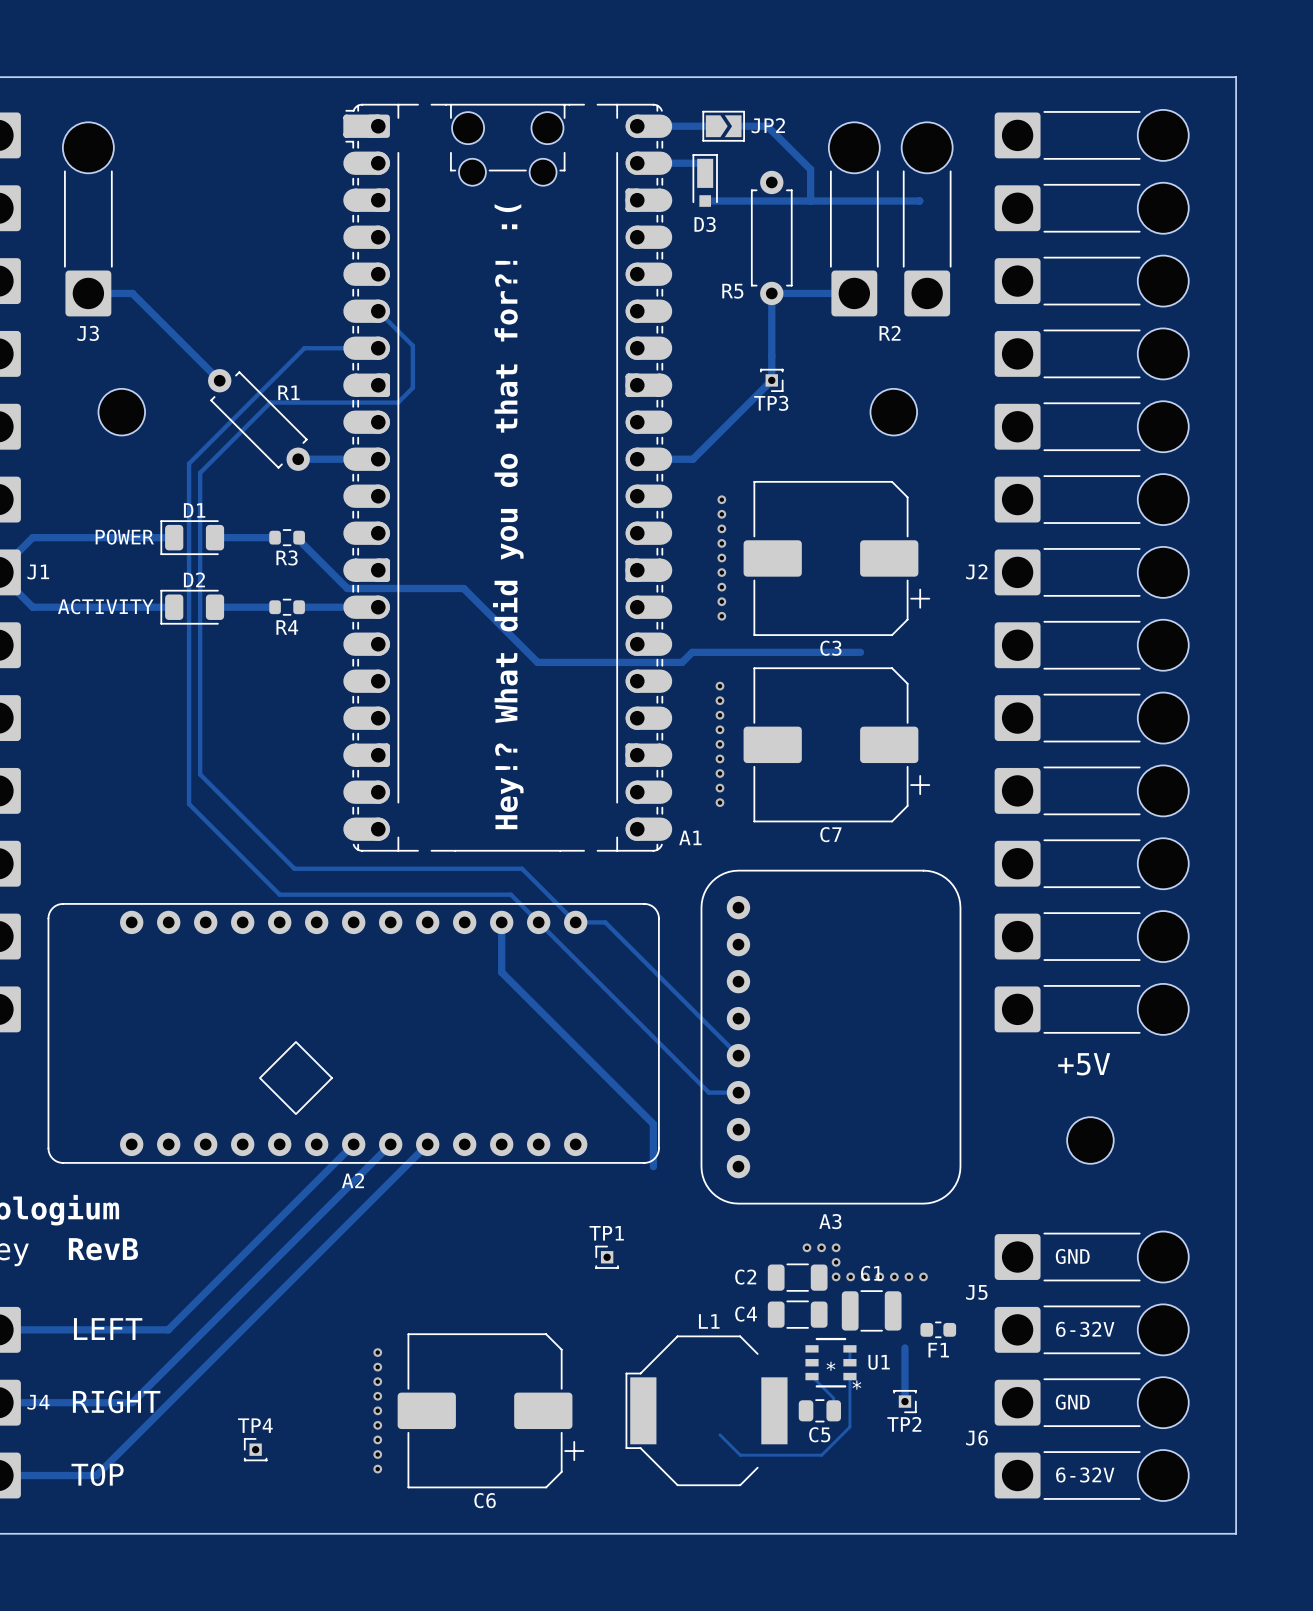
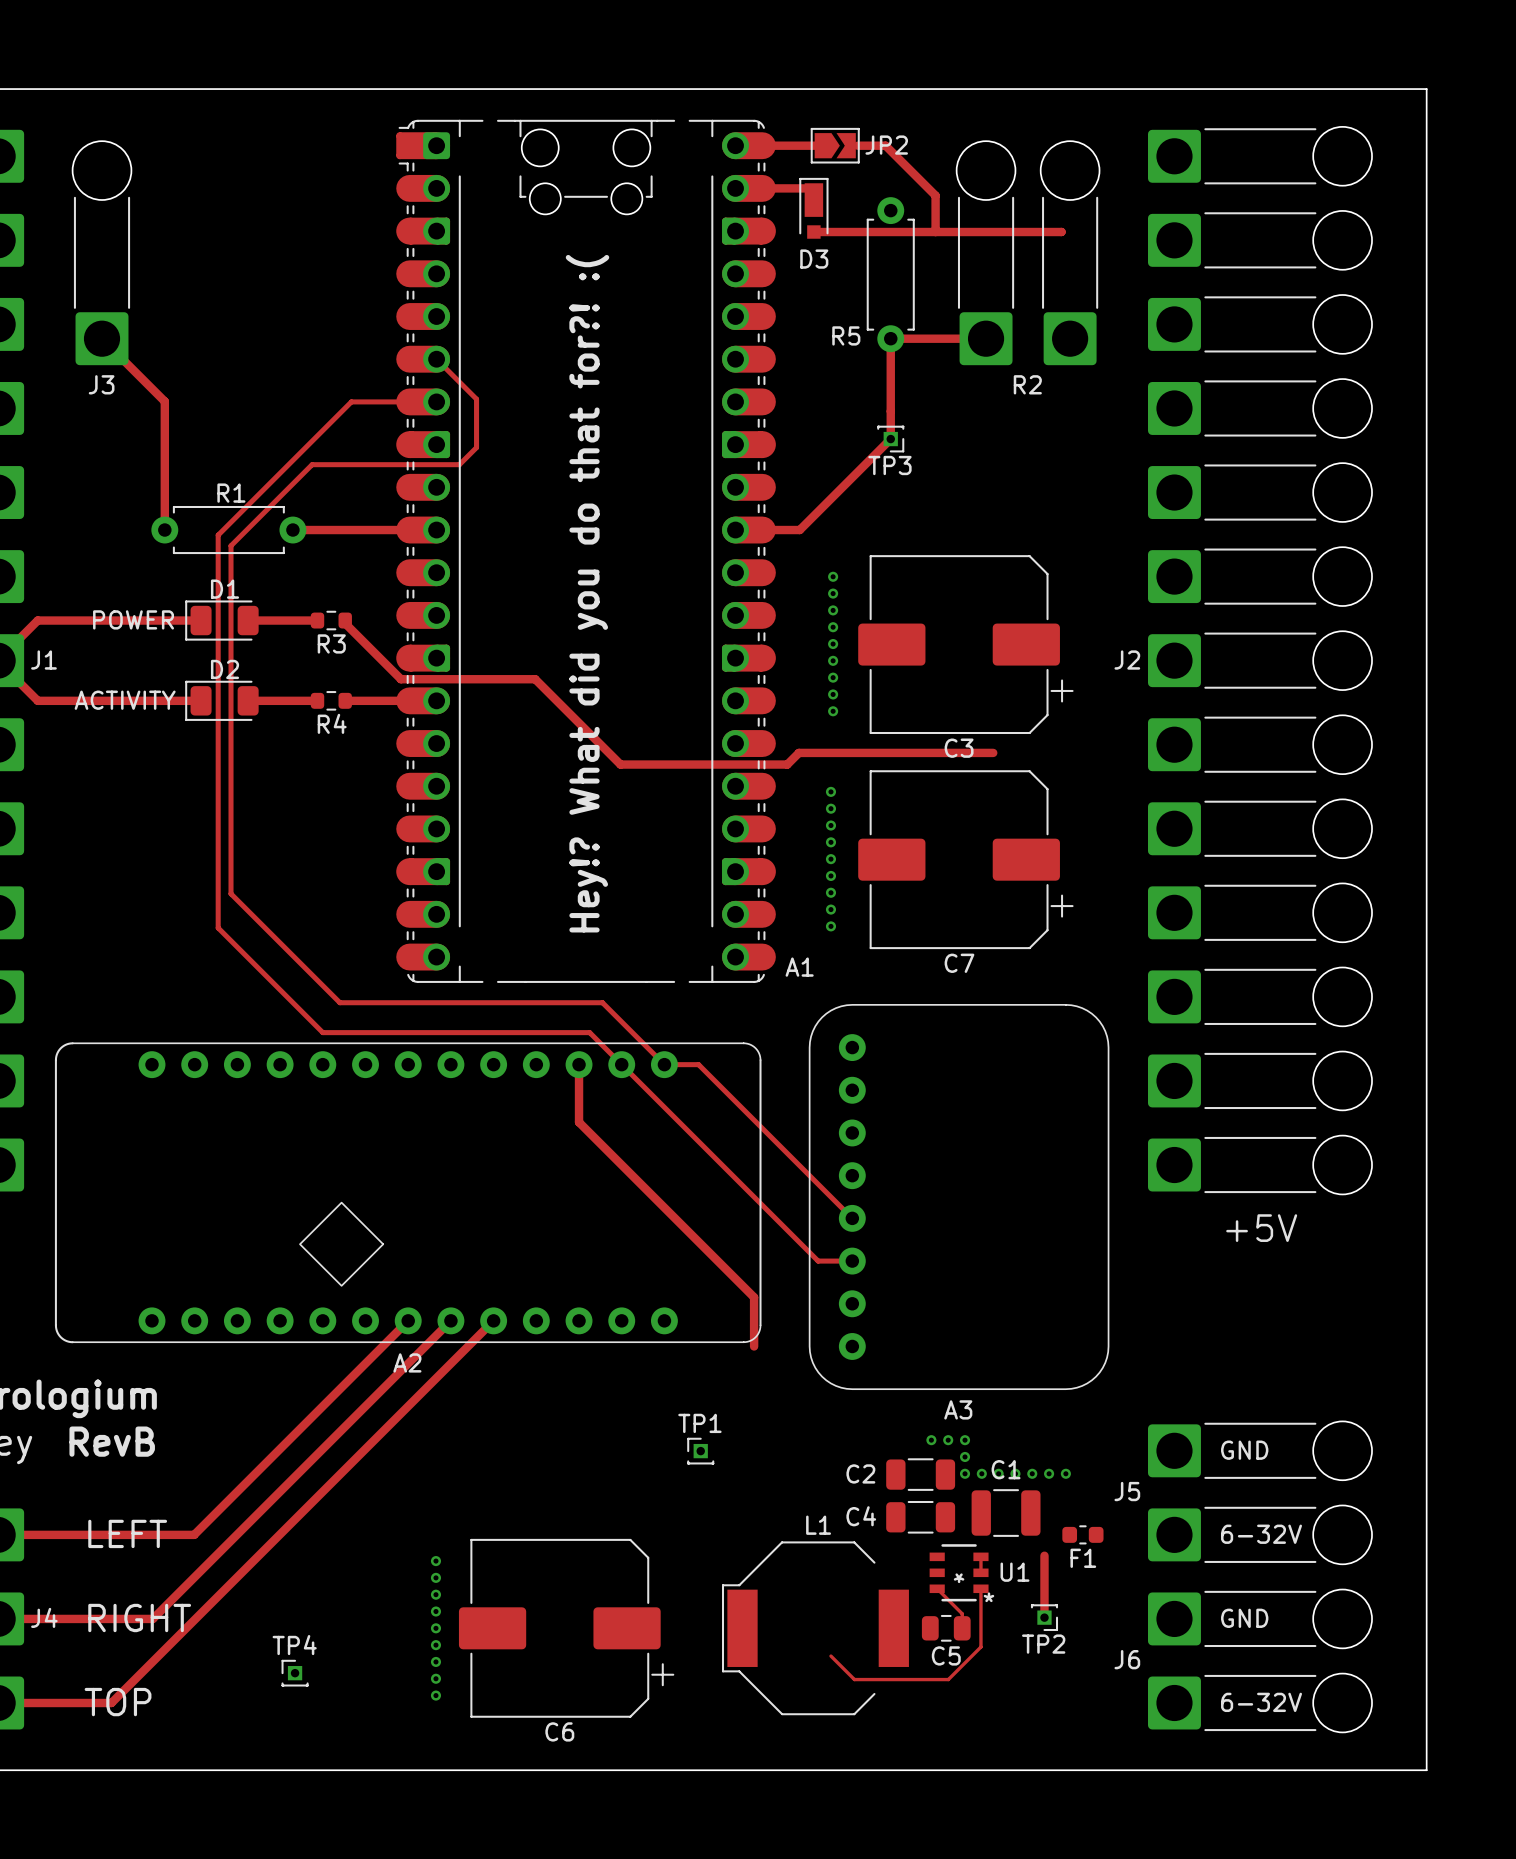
track: (88, 293) (132, 293) (219, 380) -> (102, 338) (164, 401) (164, 530)
part: (121, 412) -> none
part: (893, 412) -> none
R1 rotation: 0° (258, 419) -> 45° counterclockwise (228, 530)
R1 position: (258, 419) -> (228, 530)
track: none -> (292, 530) (344, 530)
part: (1090, 1140) -> none

